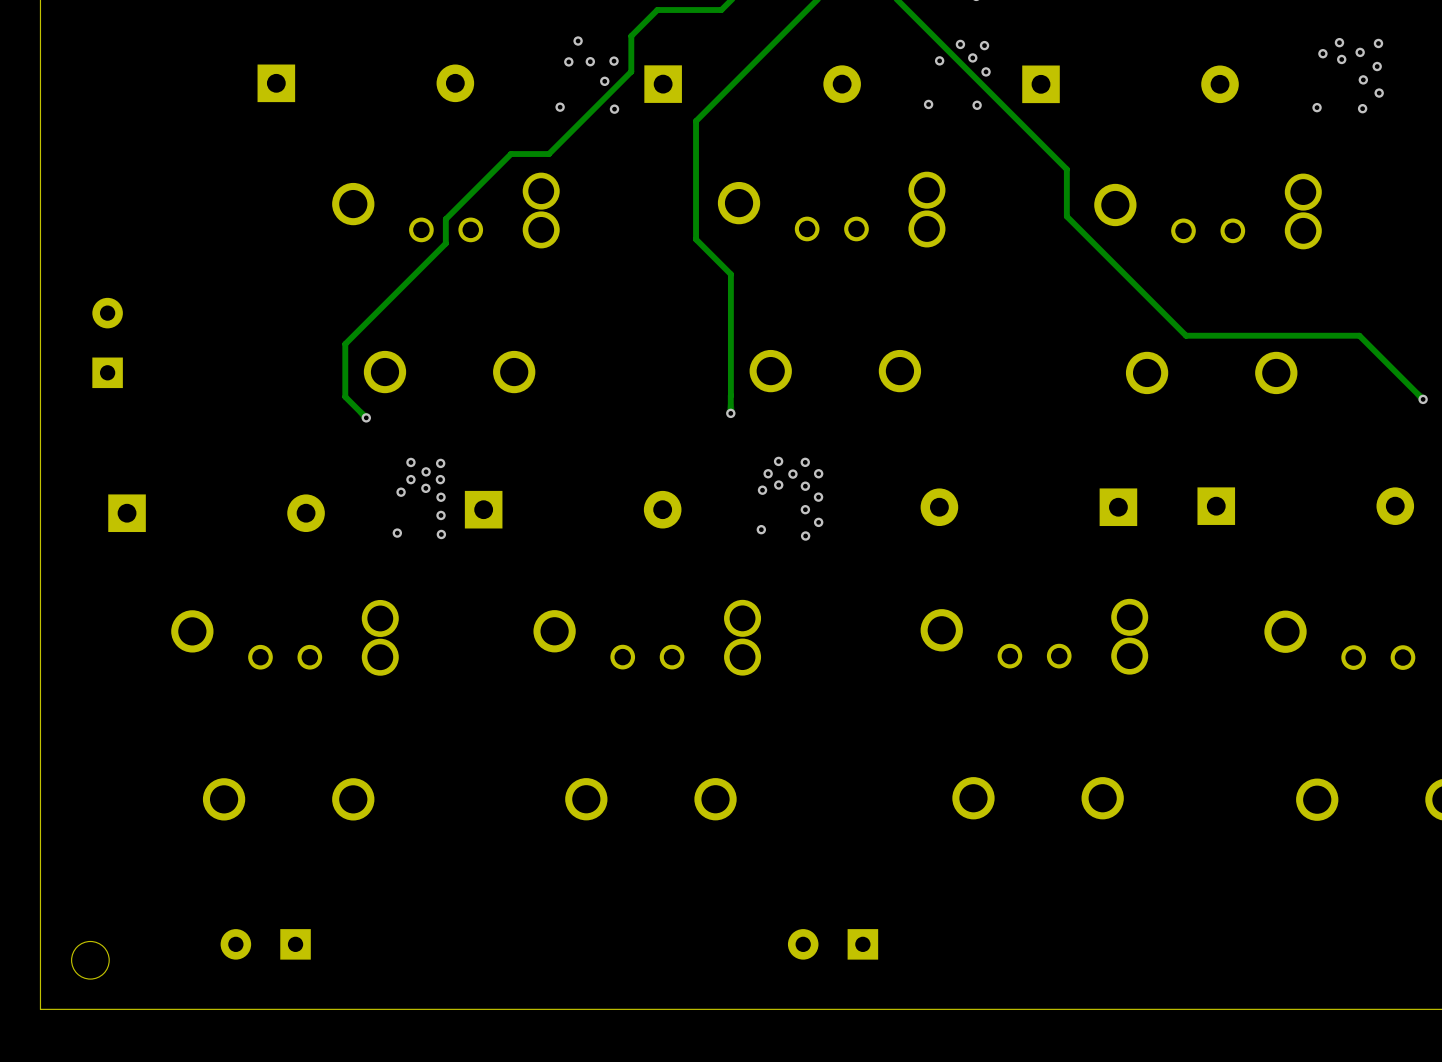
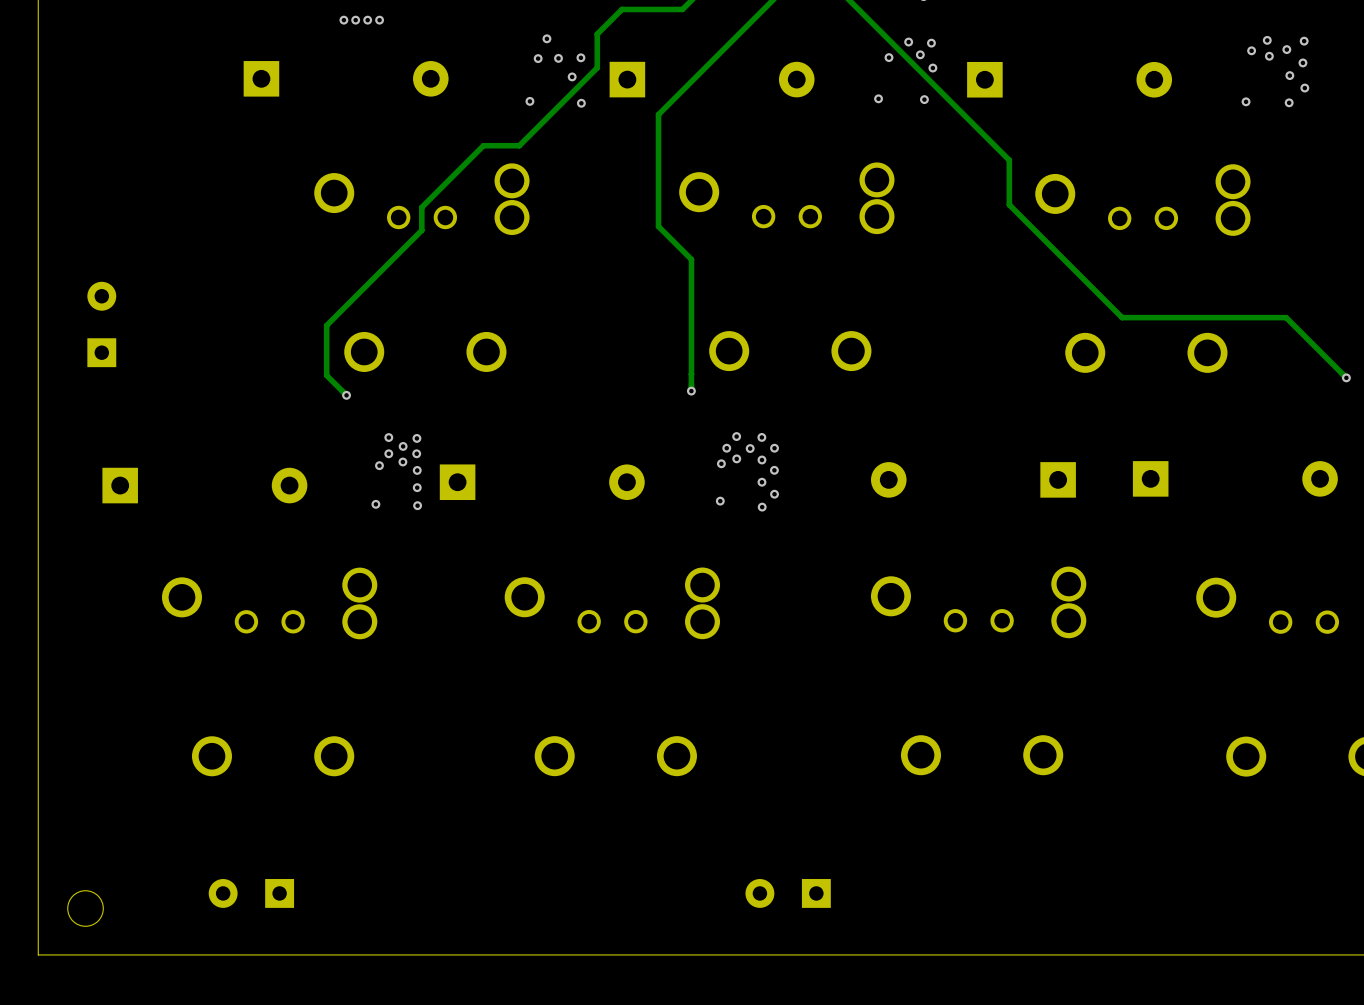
via: none -> (343, 20)
via: none -> (355, 20)
via: none -> (367, 20)
via: none -> (379, 20)

